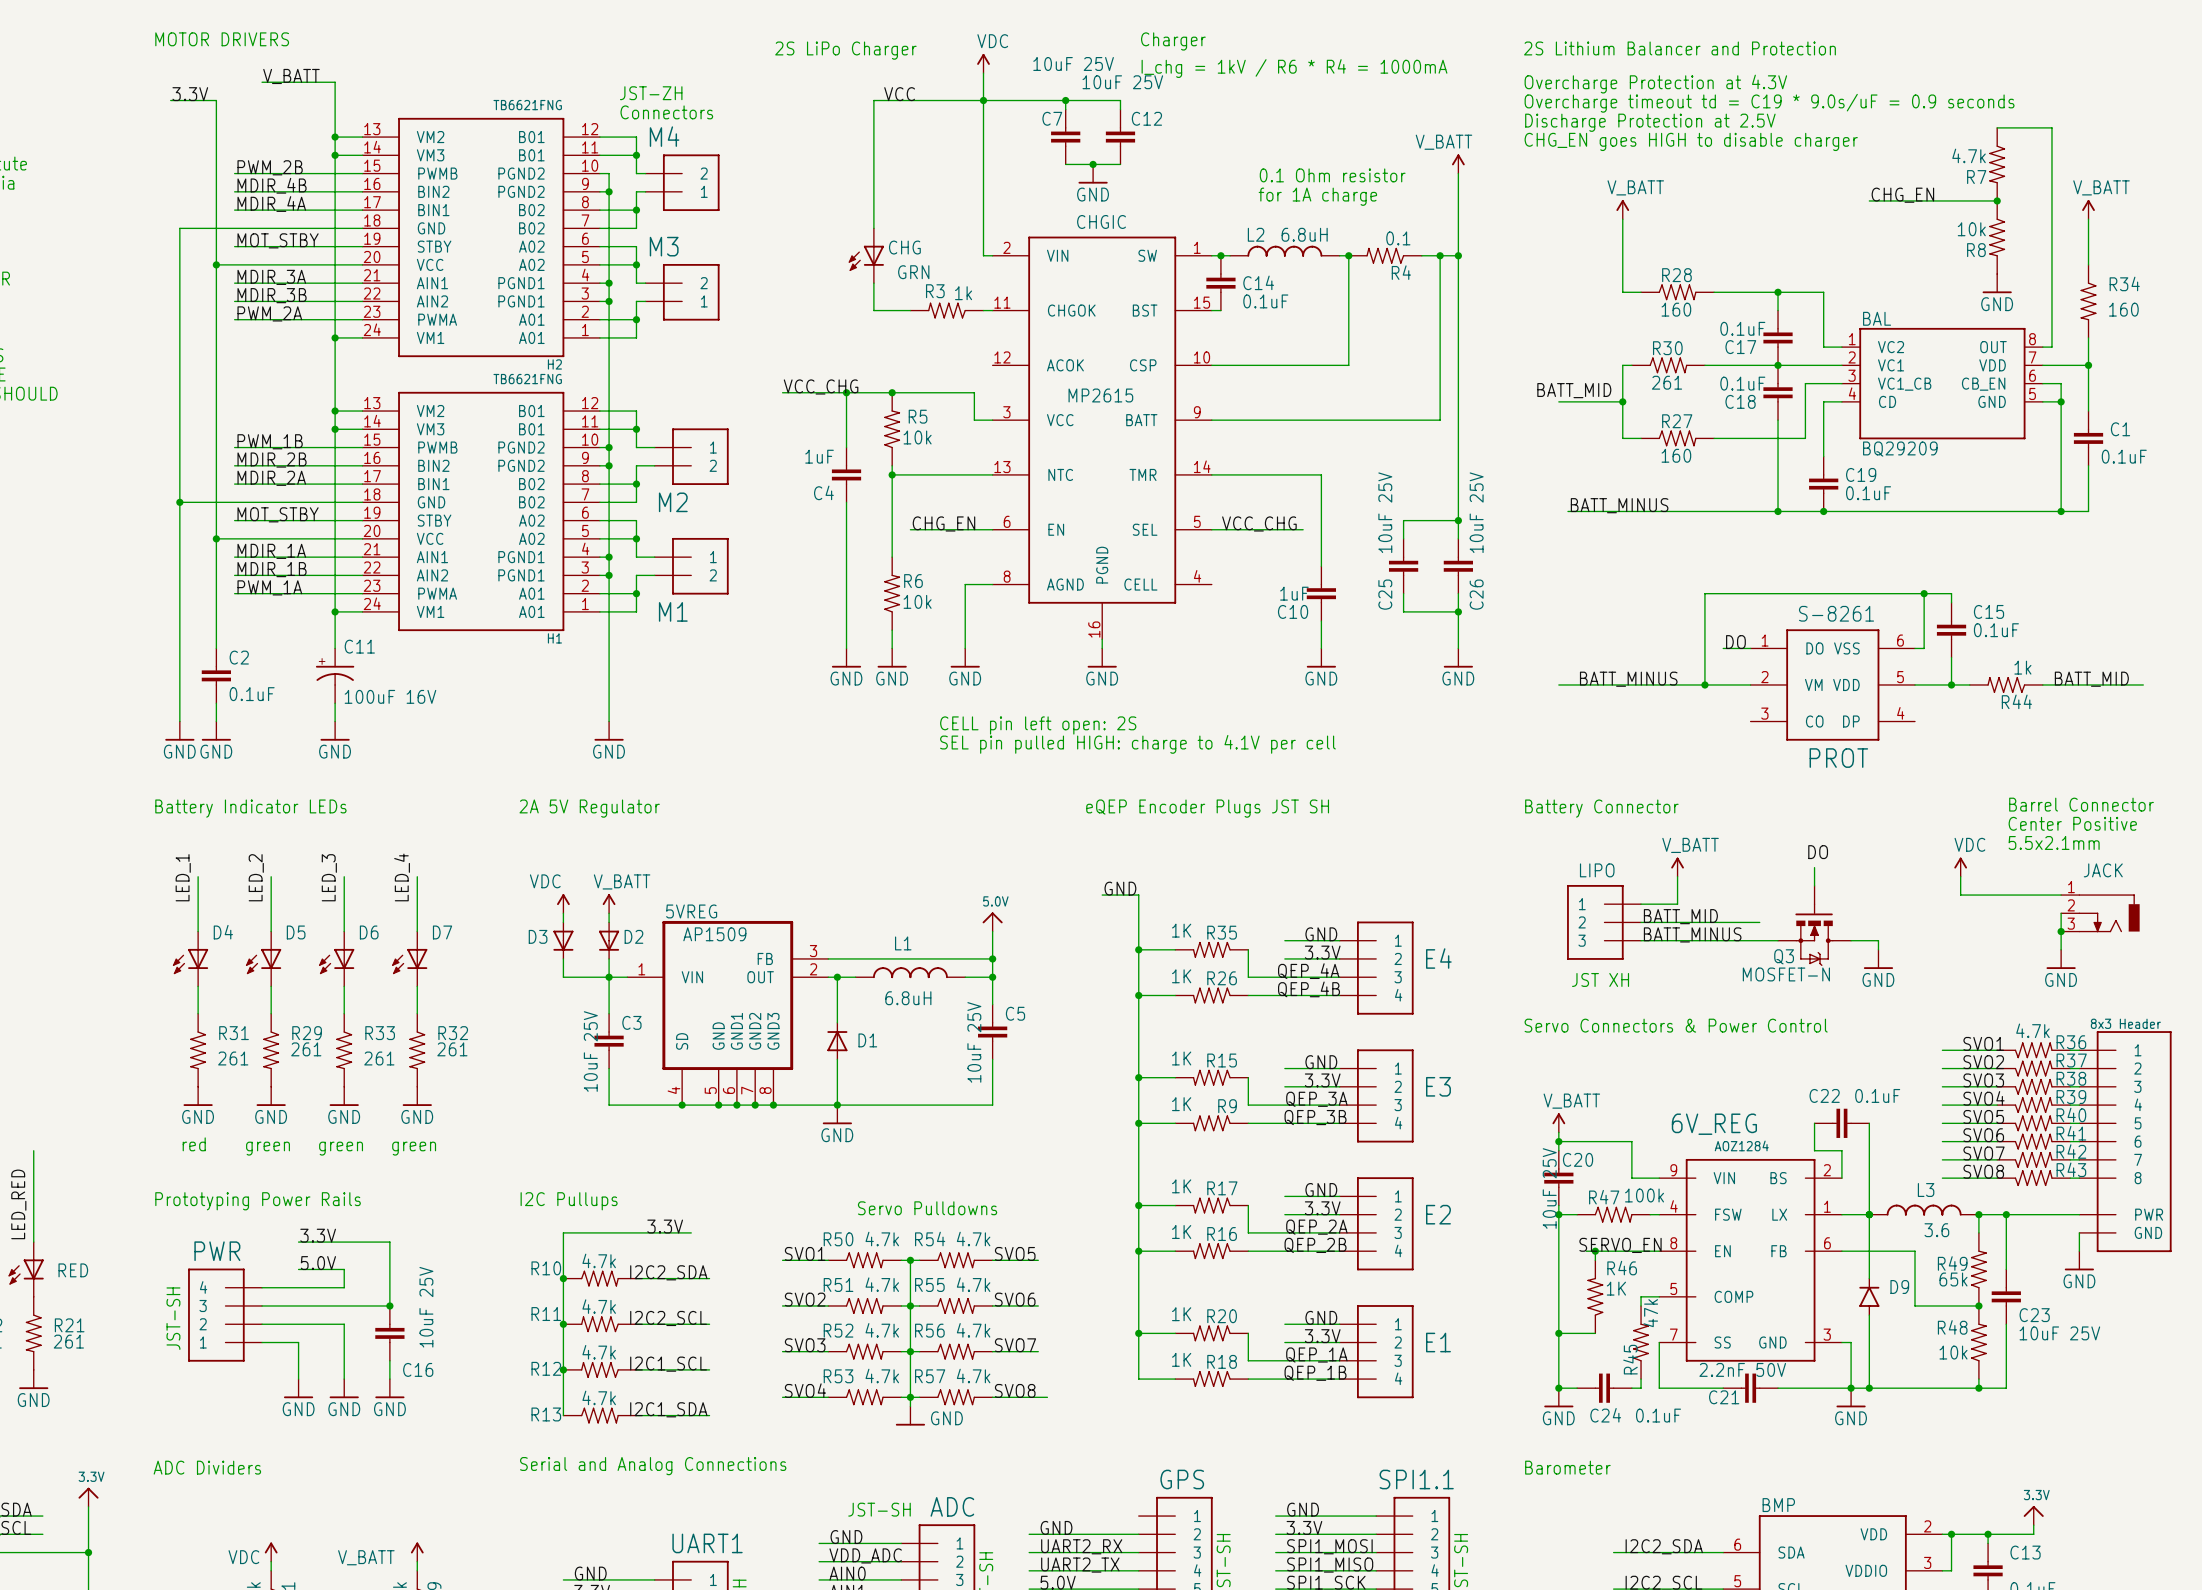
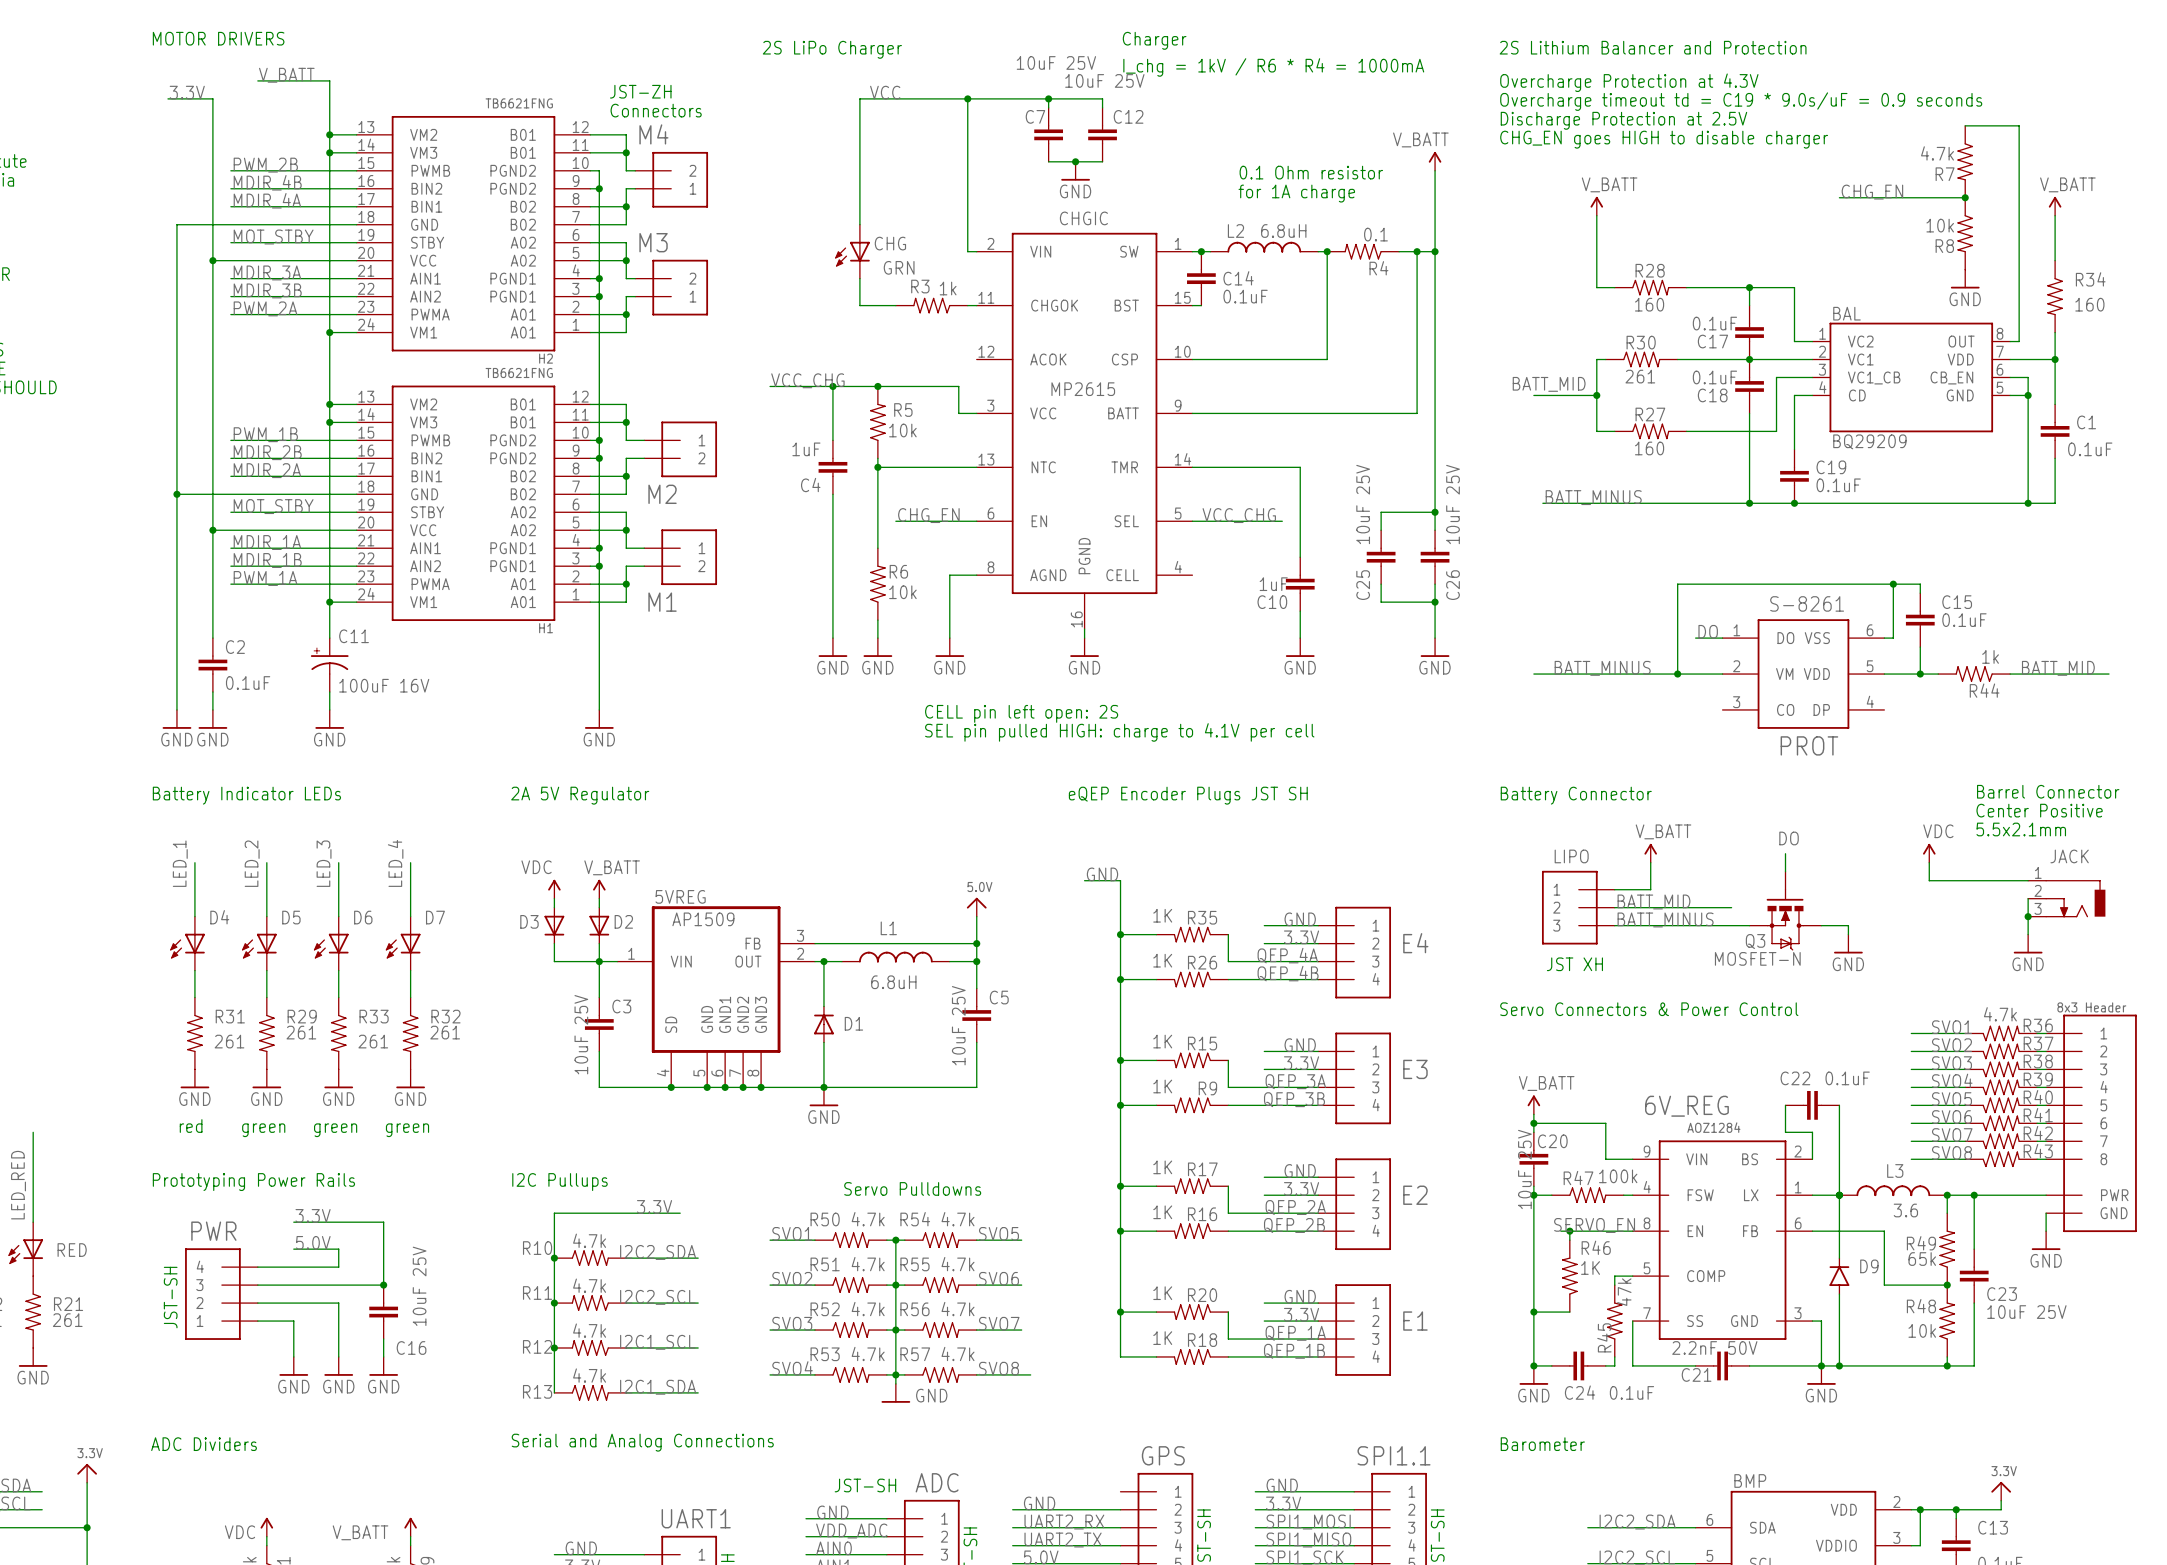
power symbol: VDC (983, 63) -> none
wire: (983, 73) (983, 100) -> none

